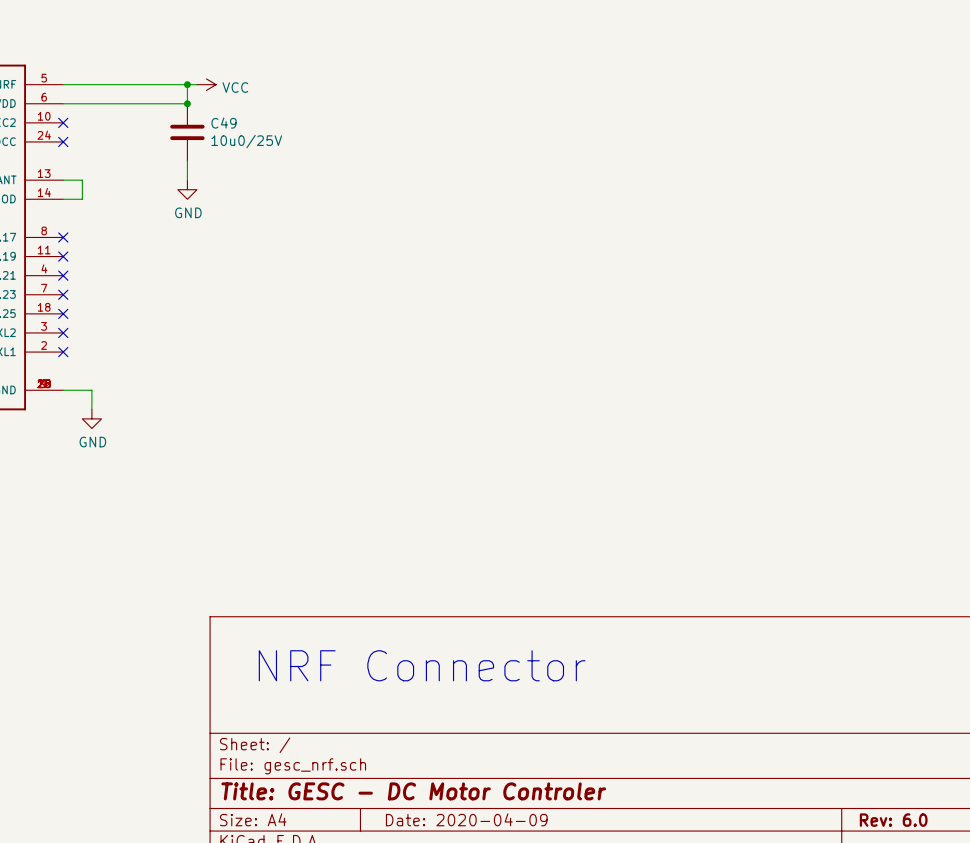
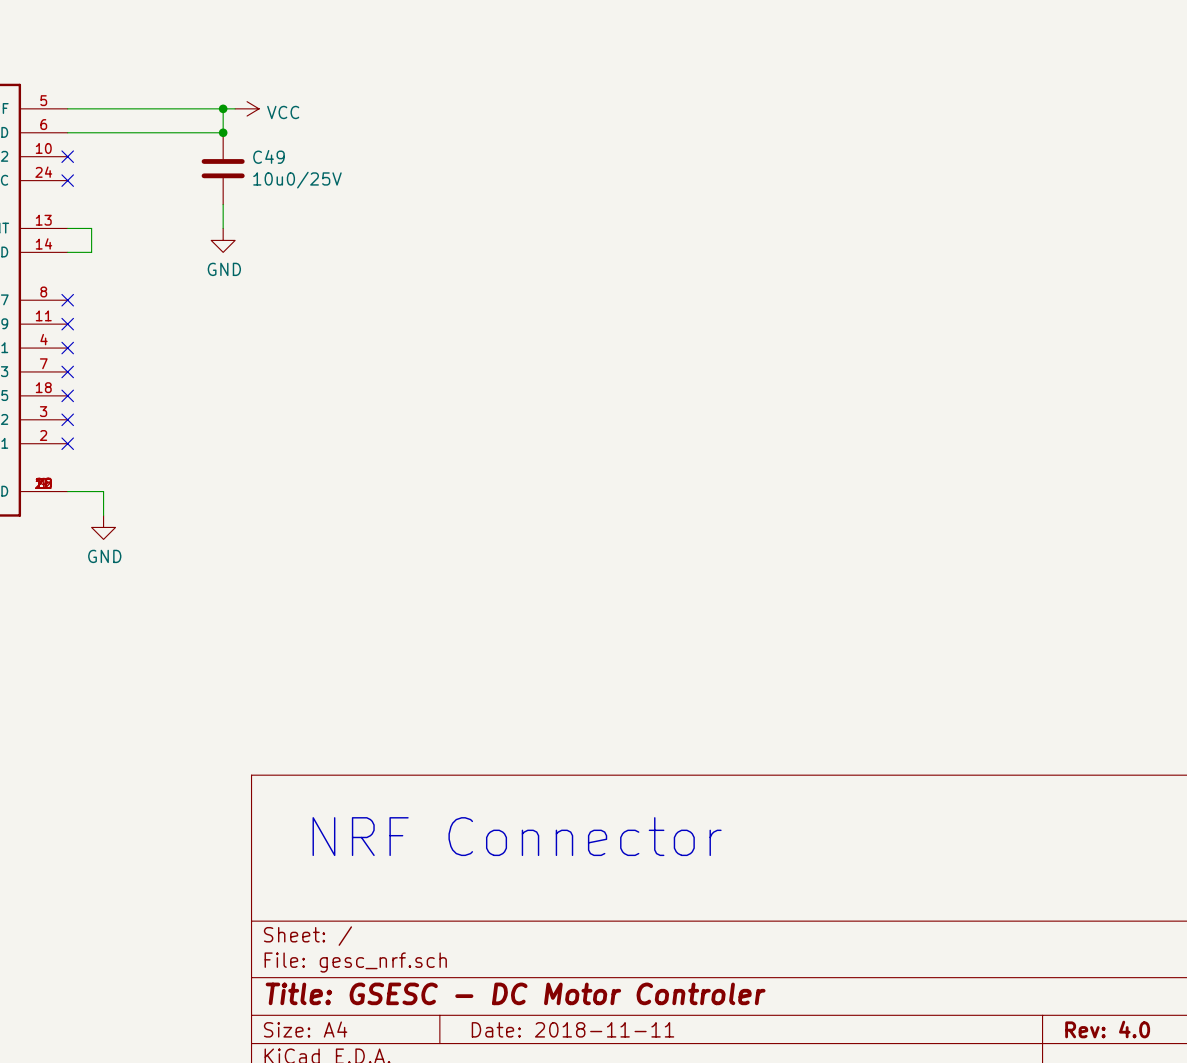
title block: Title: GESC - DC Motor Controler (413, 791) -> Title: GSESC - DC Motor Controler (515, 993)
title block: Date: 2020-04-09 (466, 819) -> Date: 2018-11-11 (572, 1029)
title block: Rev: 6.0 (893, 820) -> Rev: 4.0 (1107, 1029)

